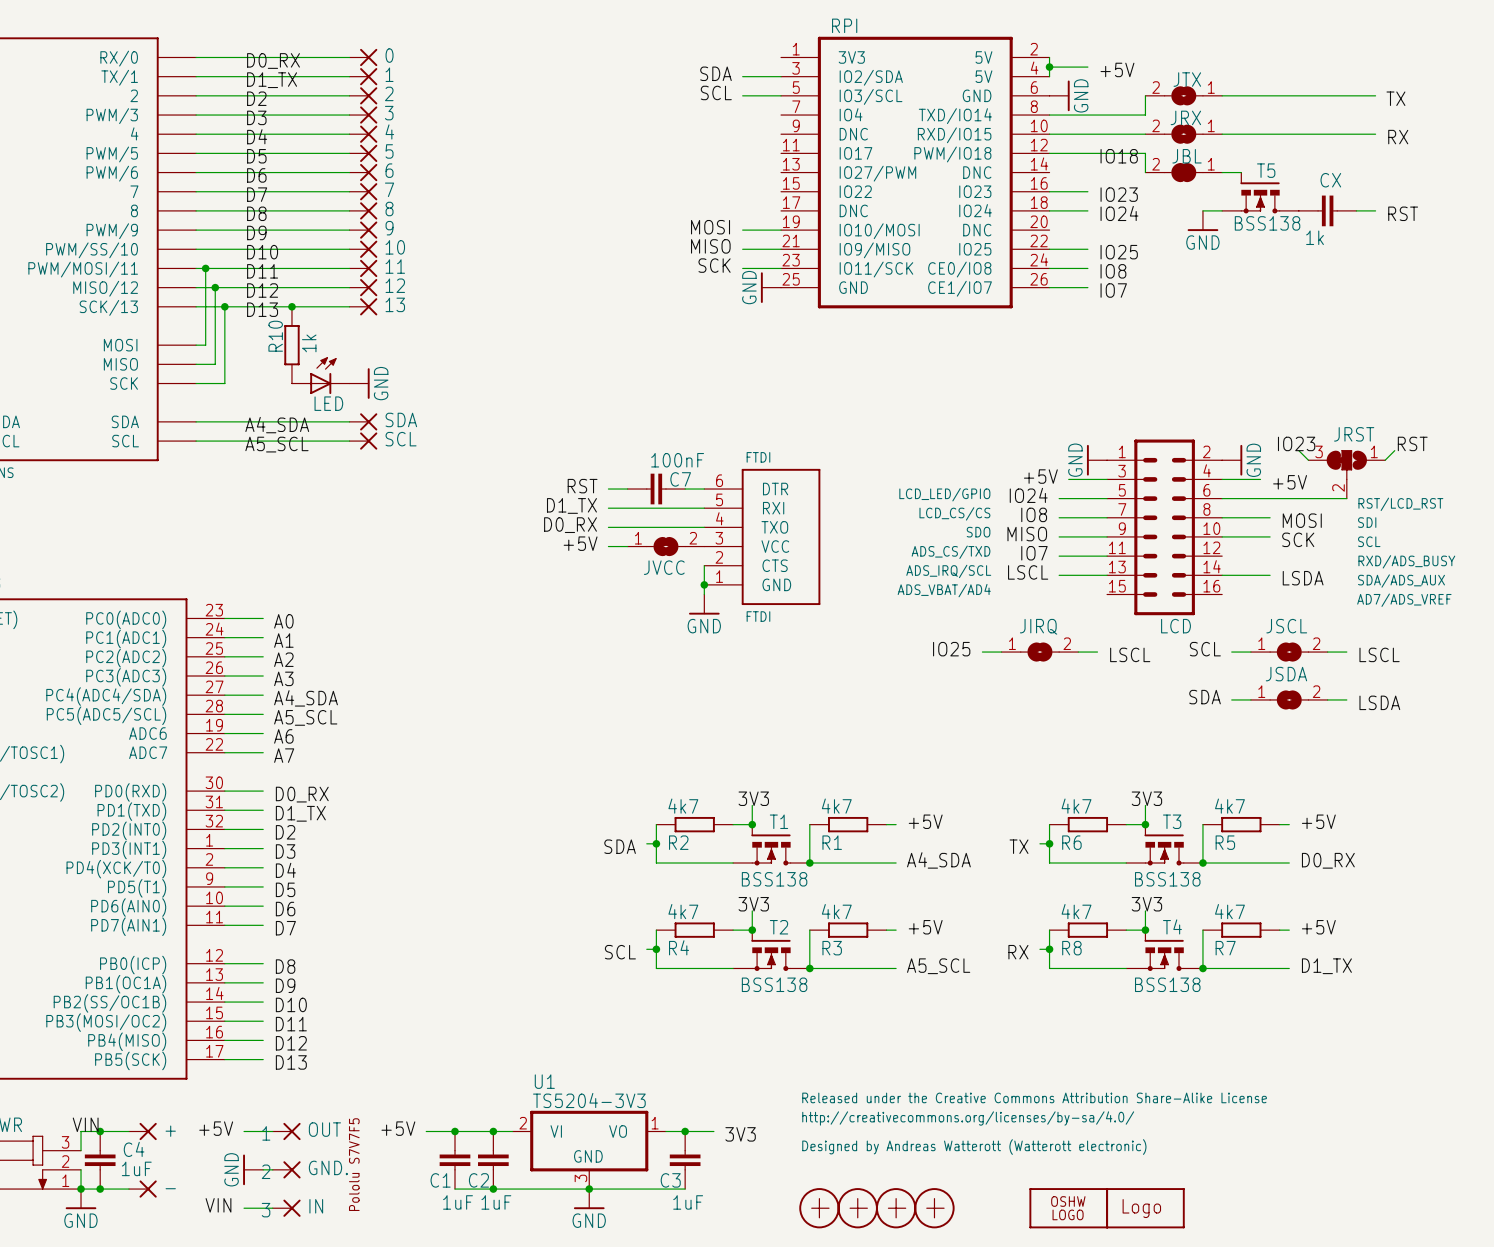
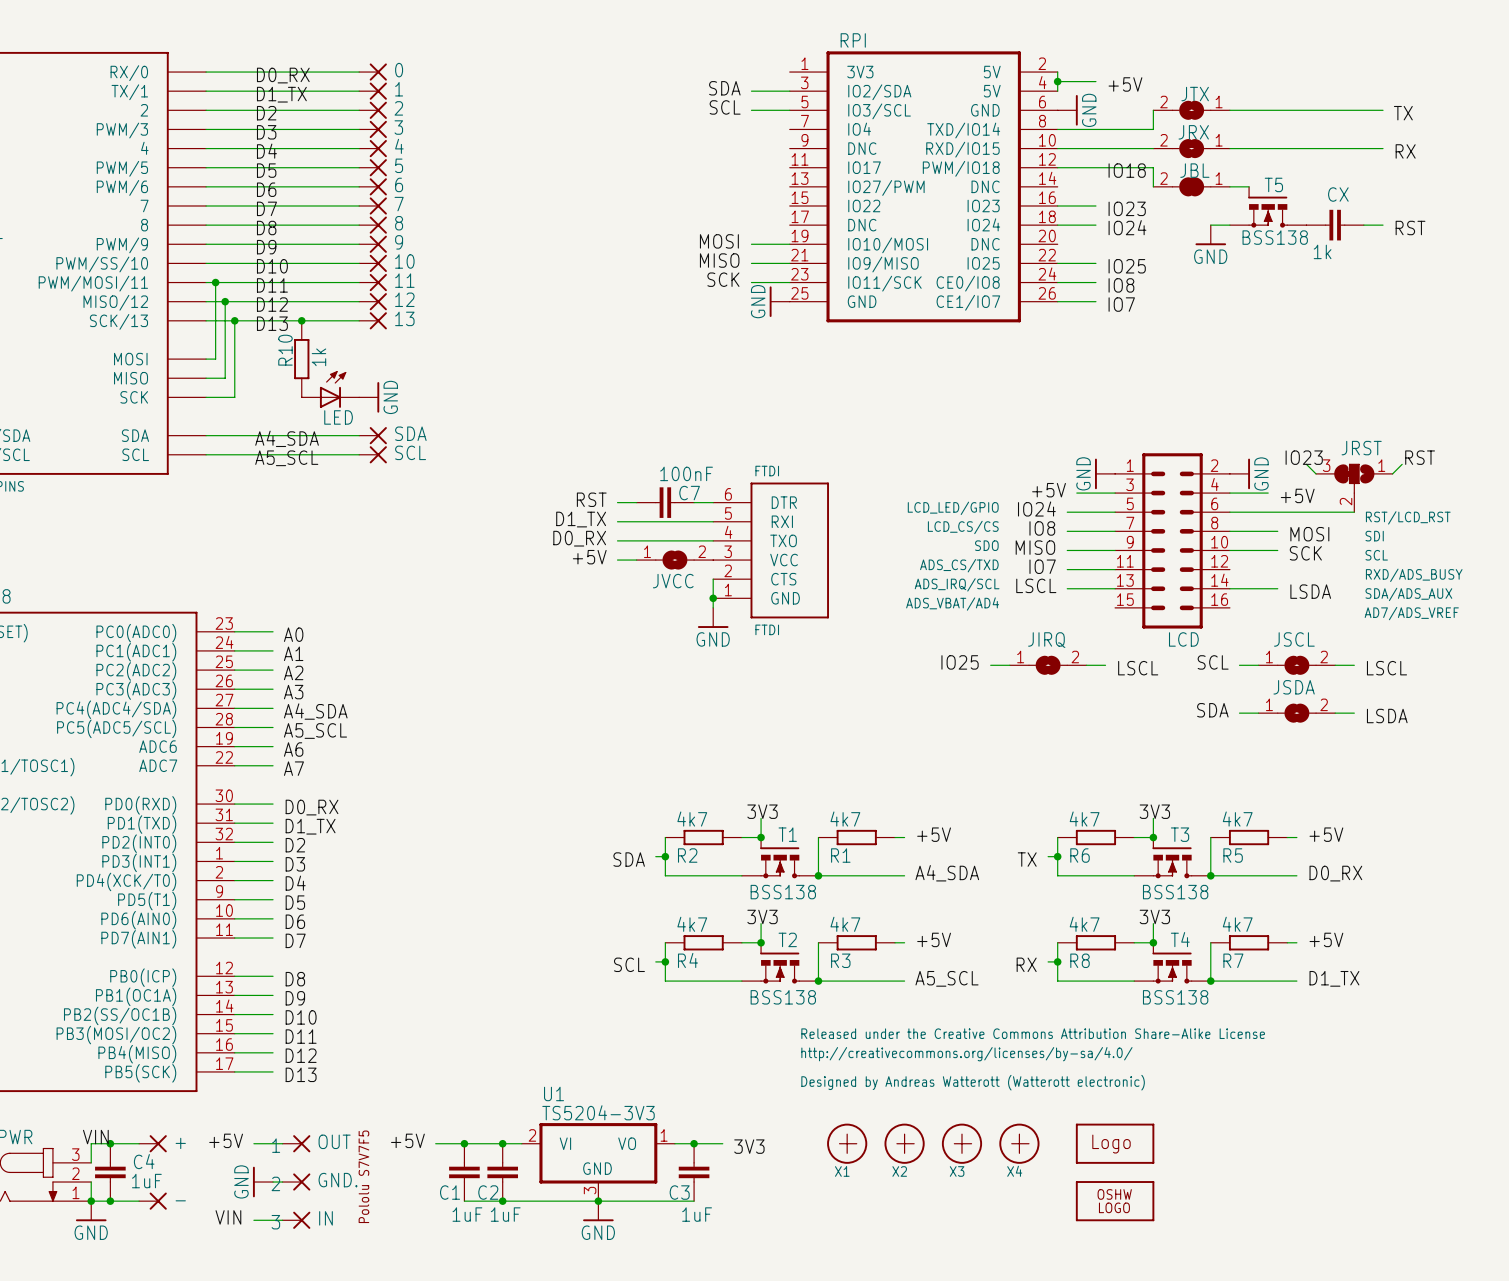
text position: Released under the Creative Commons Attribution Share-Alike License (1034, 1097) -> Released under the Creative Commons Attribution Share-Alike License (1033, 1033)
text position: http://creativecommons.org/licenses/by-sa/4.0/ (968, 1118) -> http://creativecommons.org/licenses/by-sa/4.0/ (966, 1054)
X1: none -> (847, 1143)
X2: none -> (904, 1143)
X3: none -> (961, 1143)
X4: none -> (1019, 1143)
text position: Designed by Andreas Watterott (Watterott electronic) (974, 1147) -> Designed by Andreas Watterott (Watterott electronic) (973, 1082)
part: (819, 1208) -> none
part: (857, 1208) -> none
part: (896, 1208) -> none
part: (934, 1208) -> none
part position: (1068, 1208) -> (1115, 1201)
part position: (1145, 1208) -> (1115, 1143)

